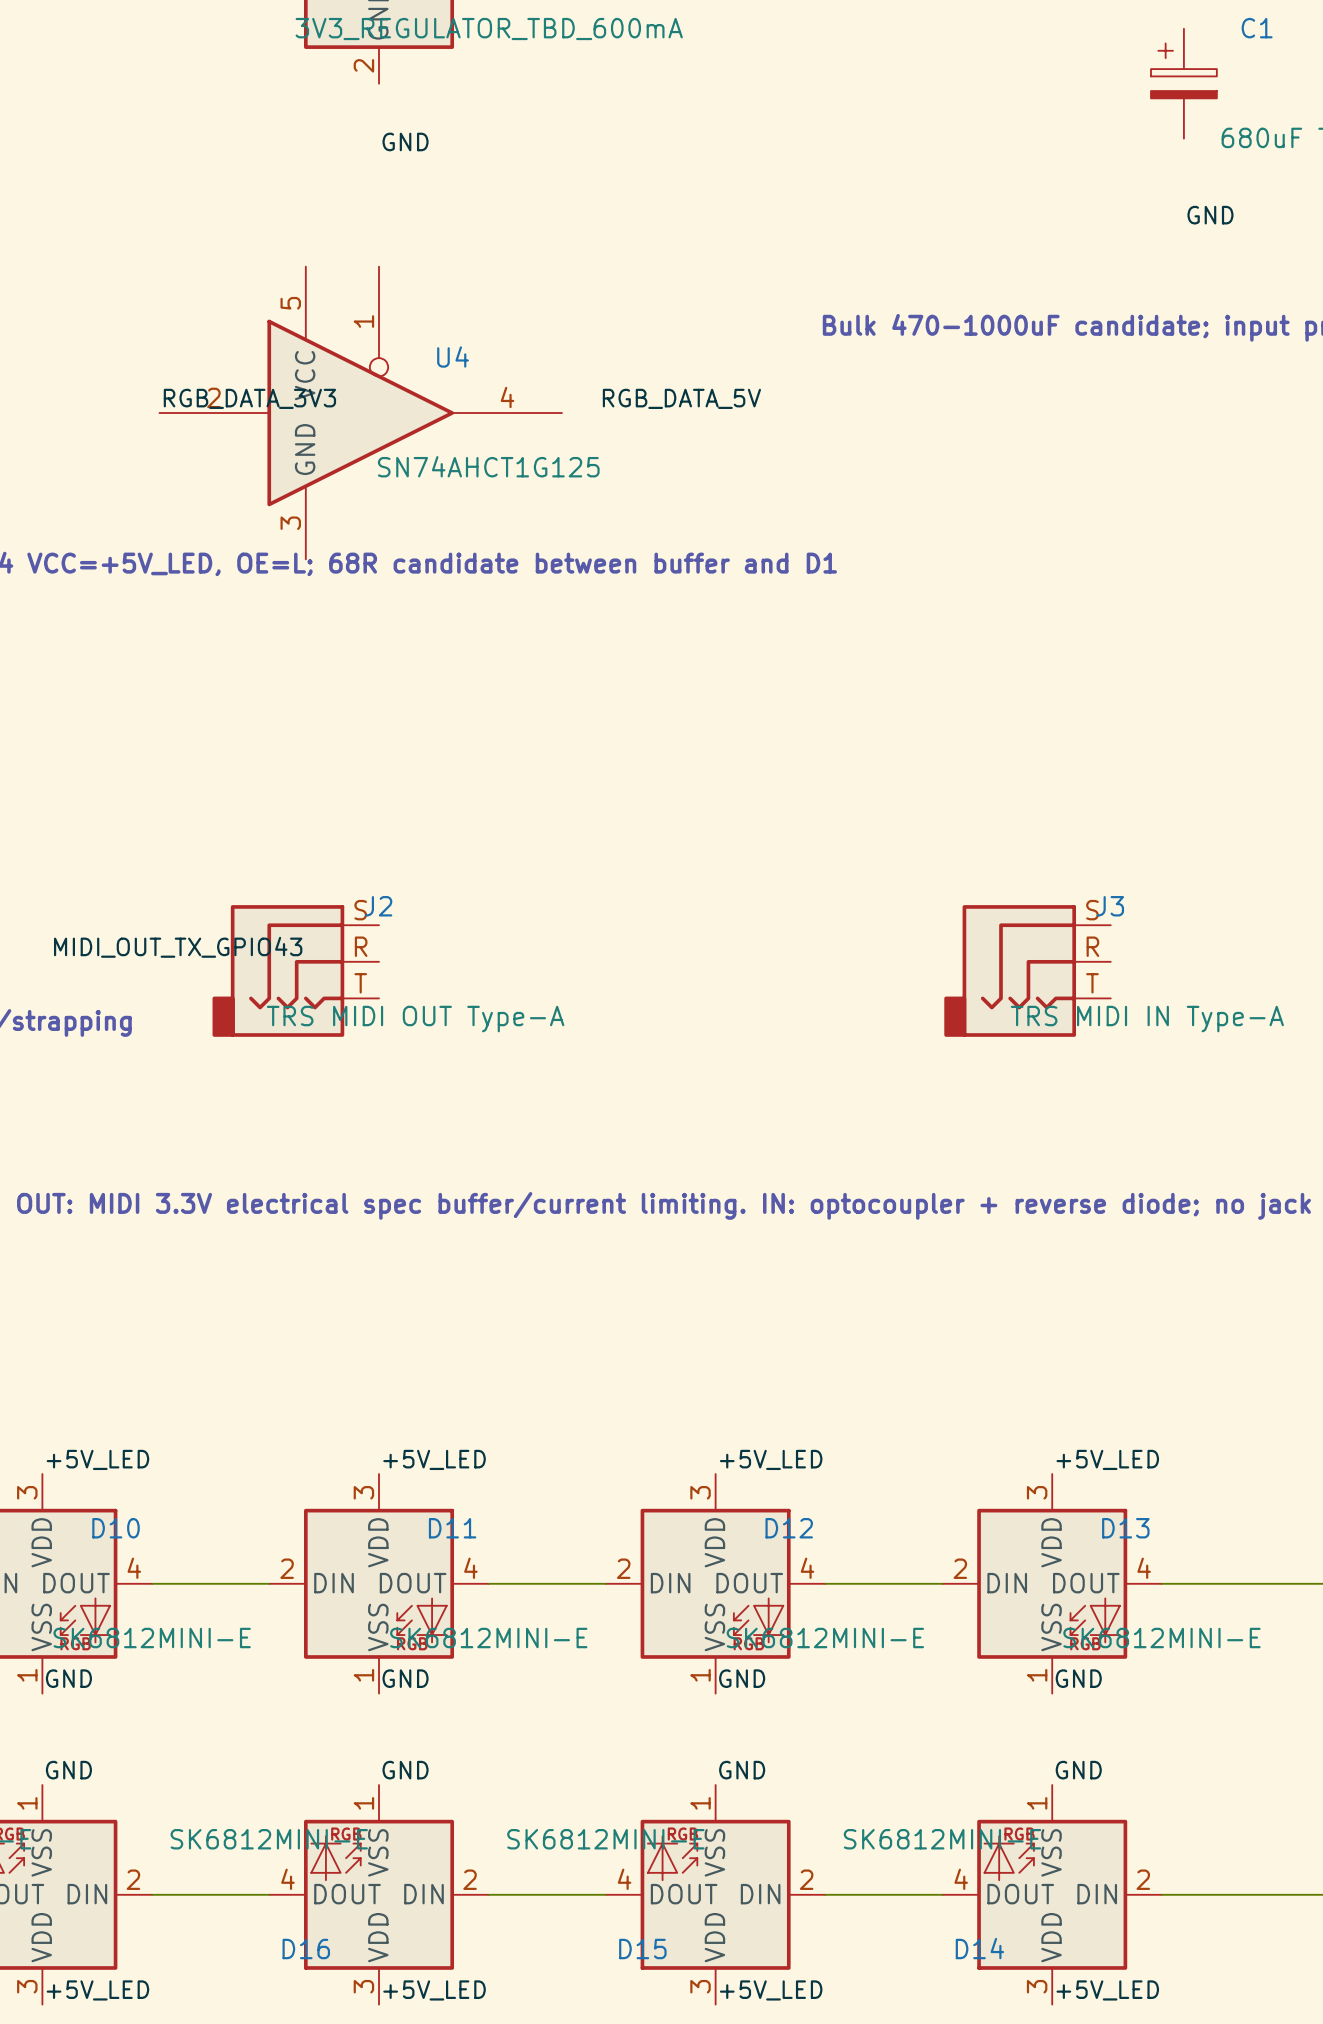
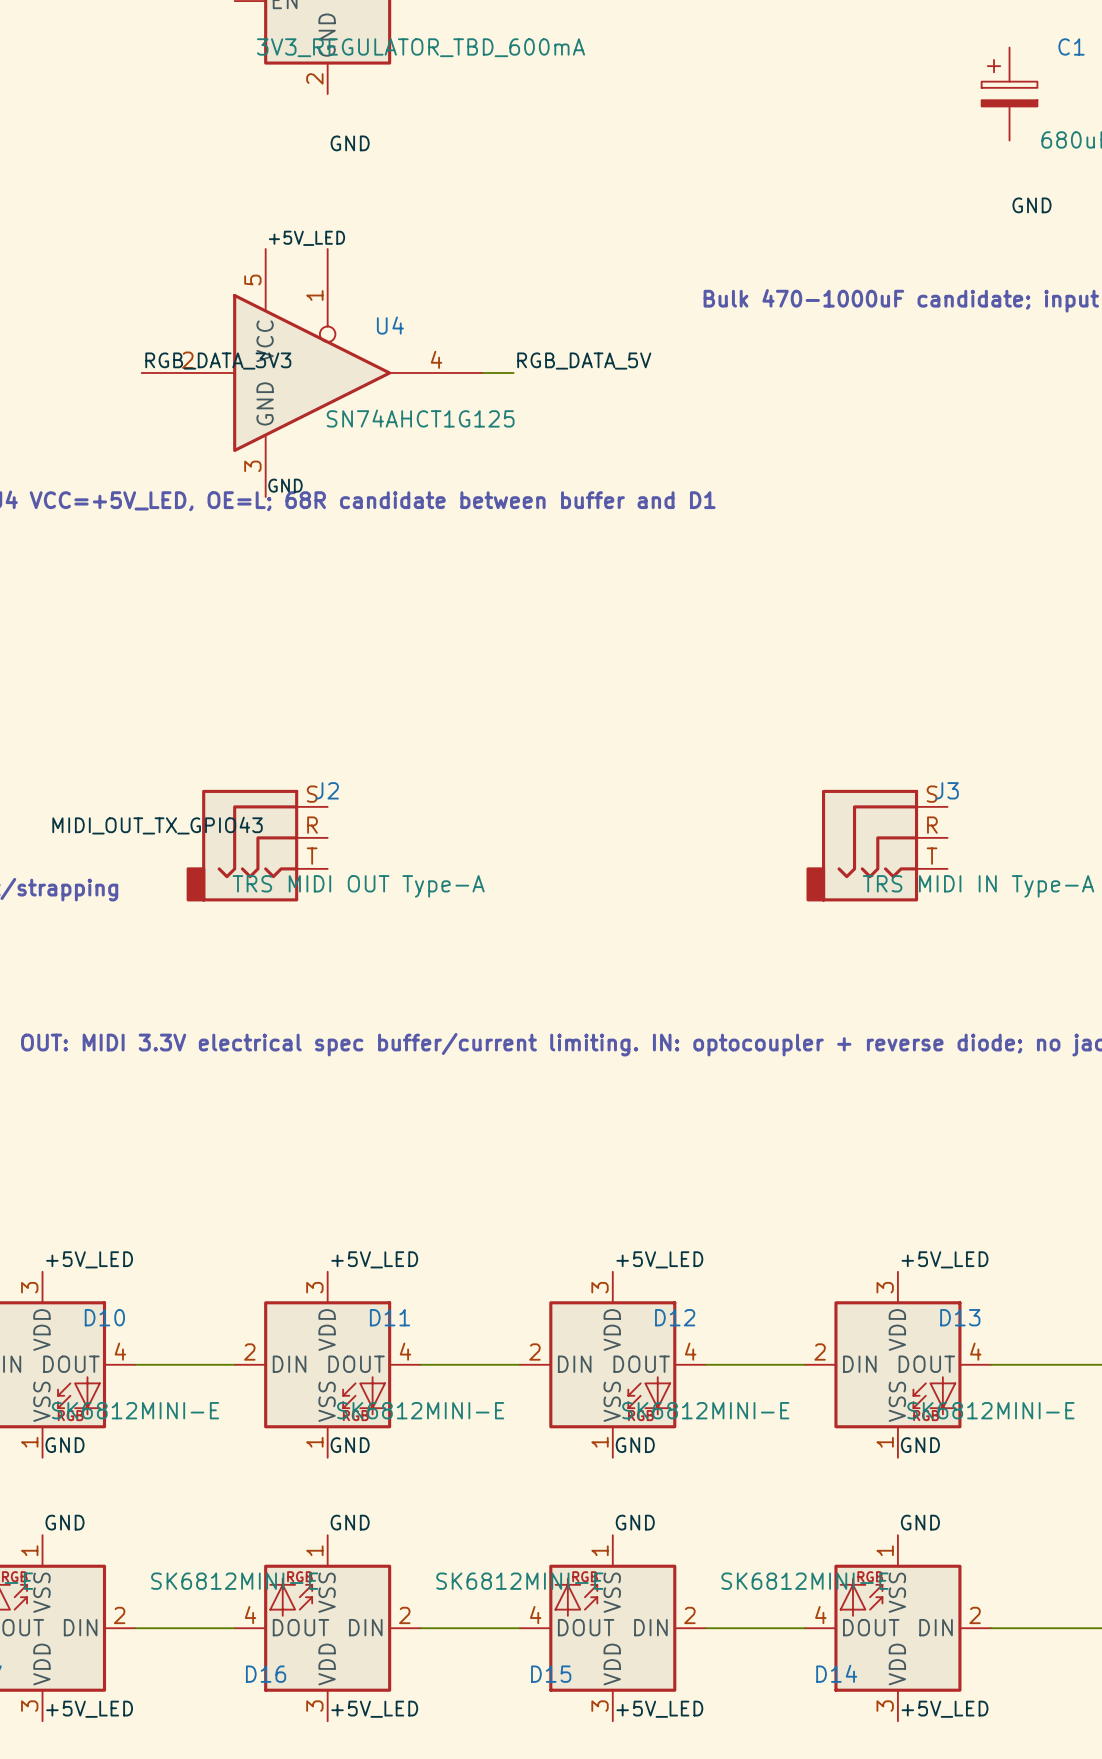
label: none -> +5V_LED (306, 238)
wire: none -> (482, 372) (513, 372)
label: none -> GND (285, 485)

